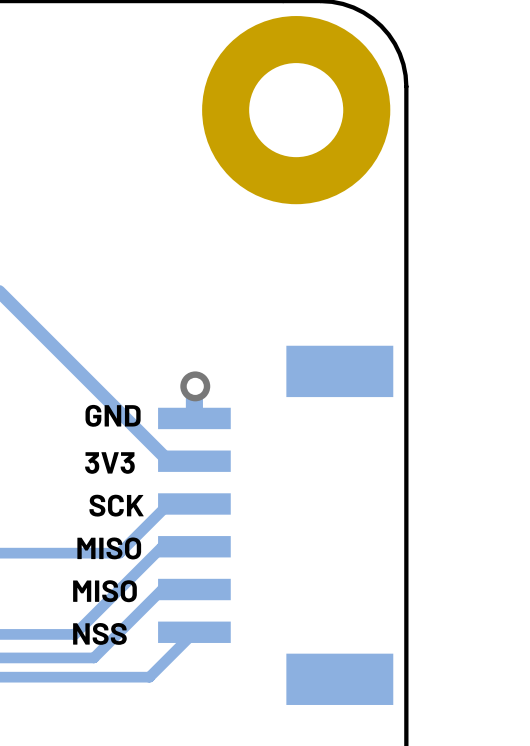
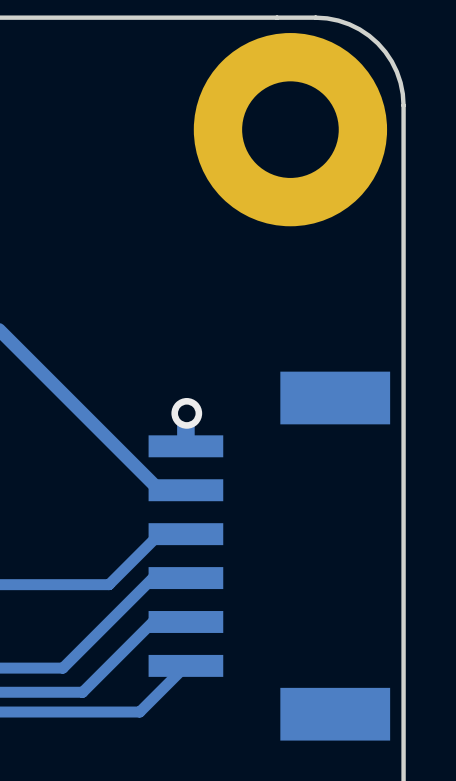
text: GND (113, 415) -> none
text: 3V3 (109, 462) -> none
text: SCK (116, 505) -> none
text: MISO (109, 548) -> none
text: MISO (104, 591) -> none
text: NSS (99, 633) -> none

